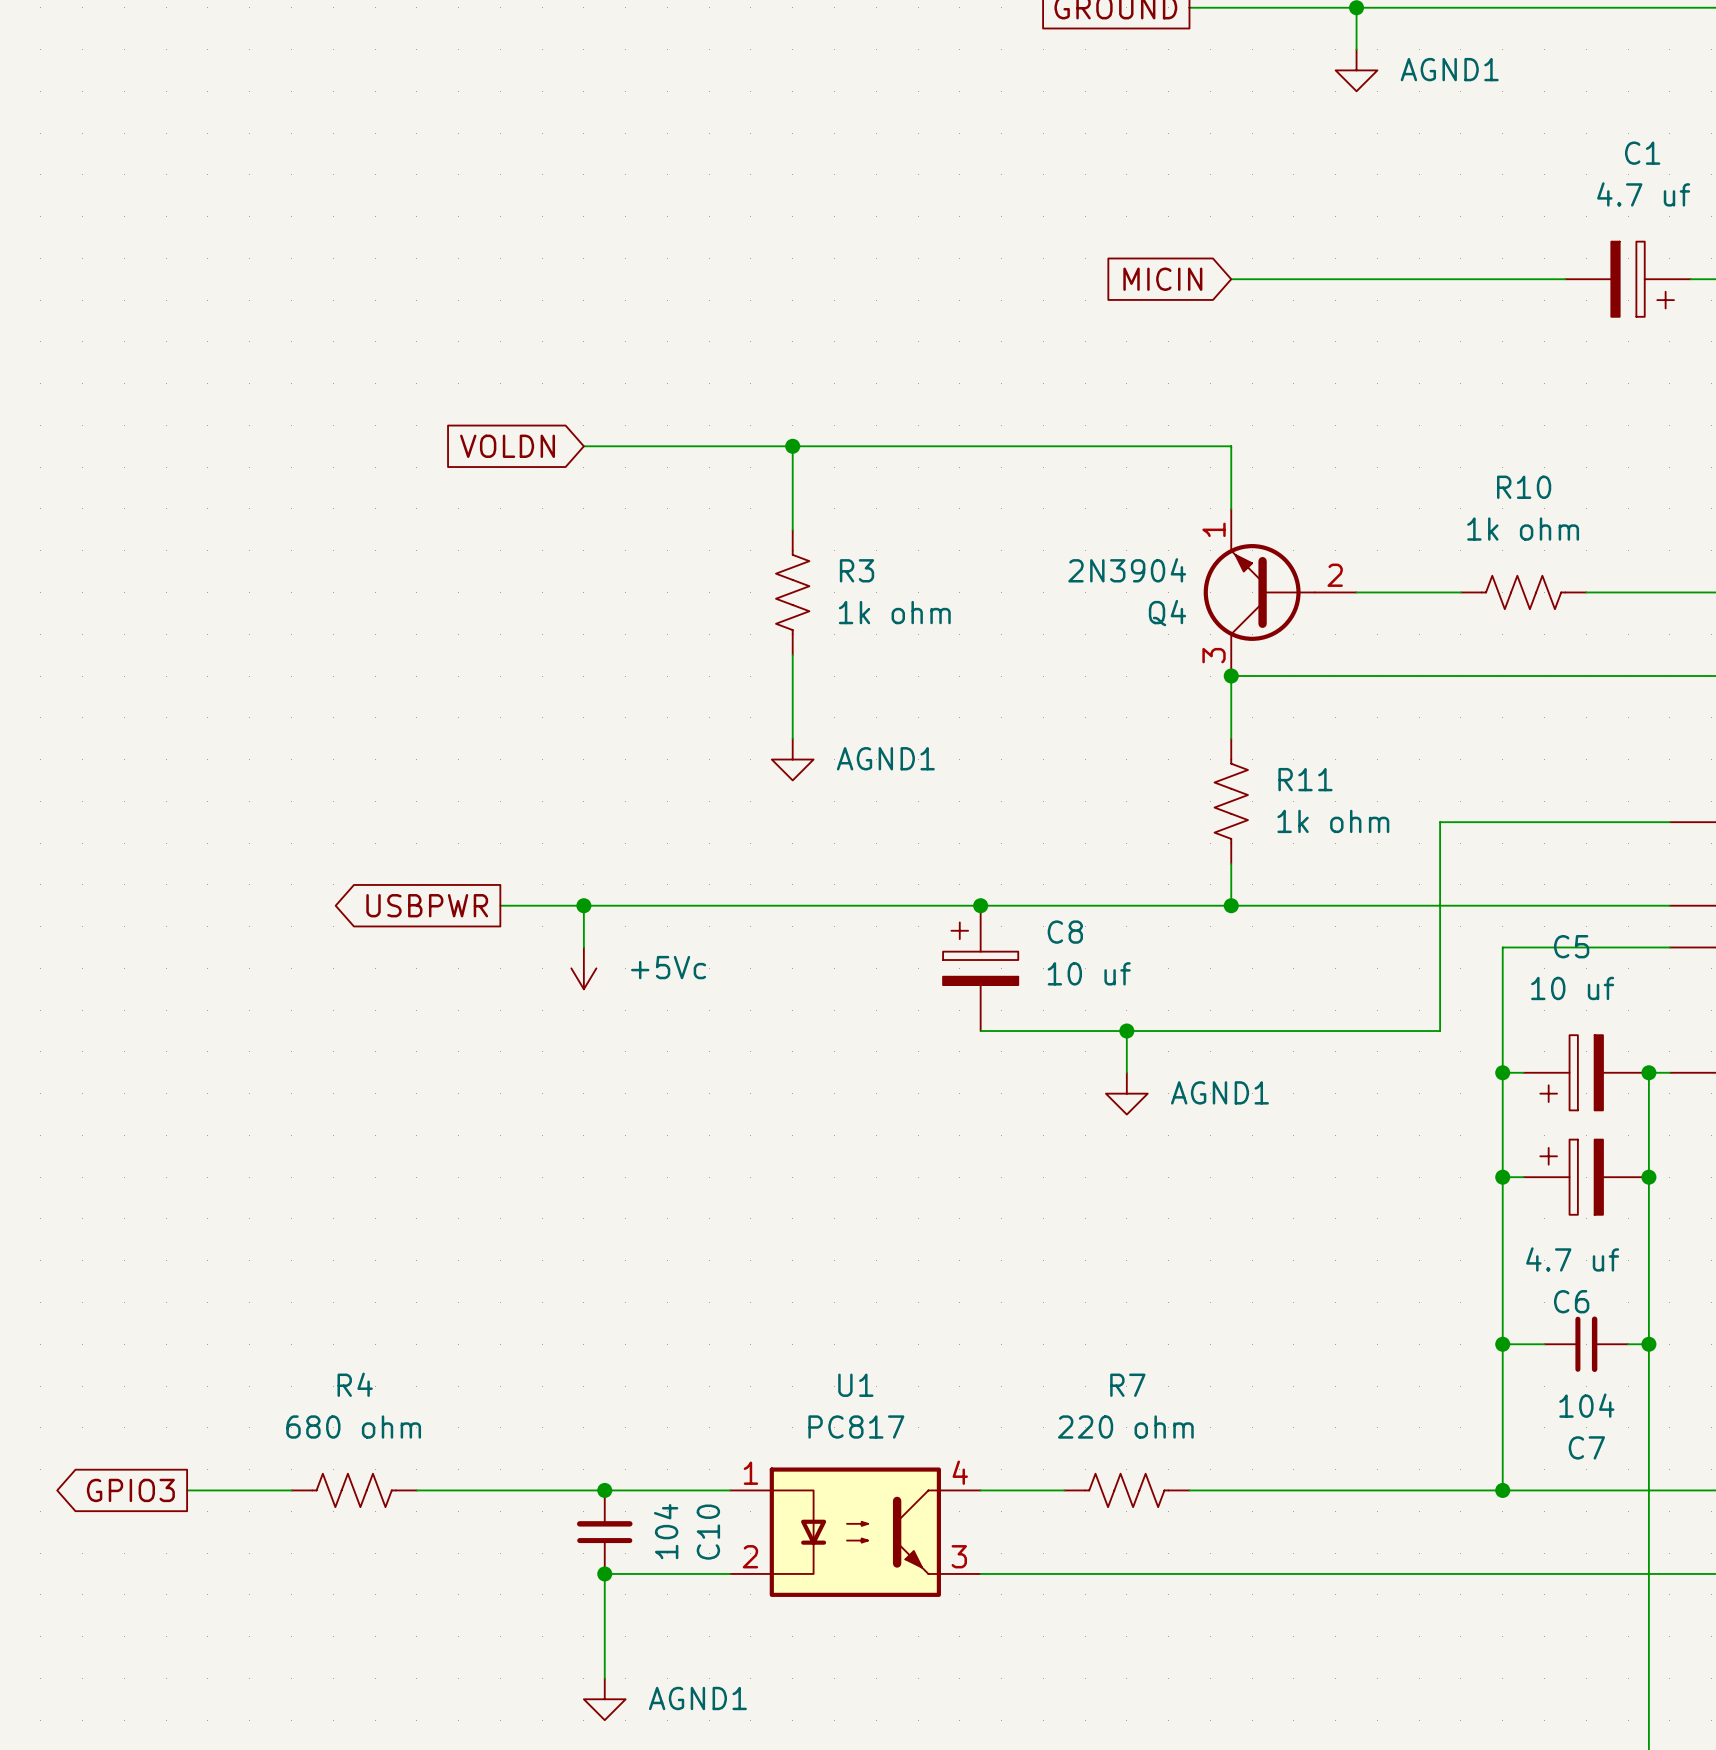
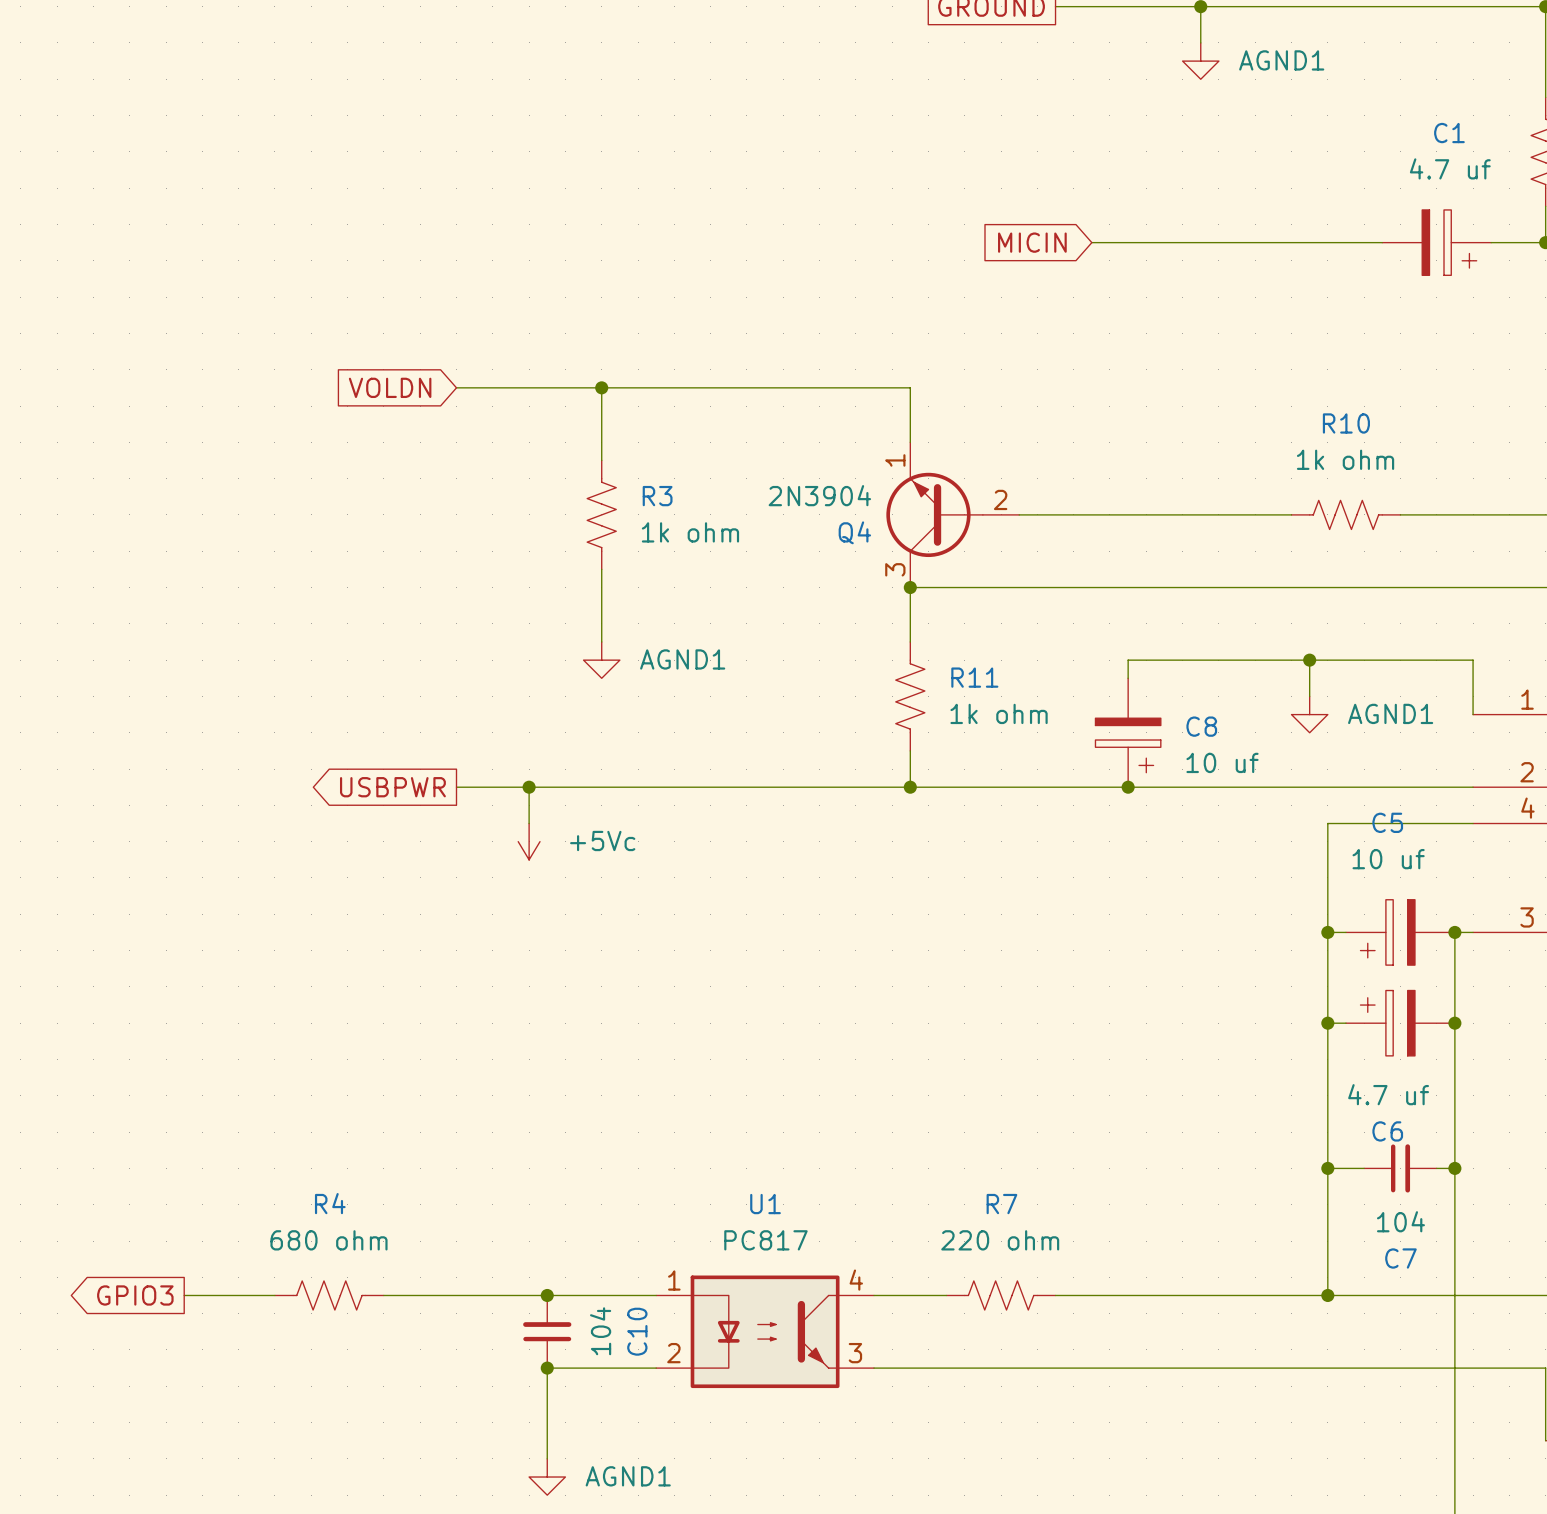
wire: none -> (456, 387) (529, 387)
global label position: VOLDN (507, 446) -> VOLDN (390, 387)
junction: none -> (601, 387)
wire: (792, 446) (792, 529) -> (601, 387) (601, 460)
junction: (792, 446) -> none
wire: (1022, 446) (1231, 446) (1231, 508) -> (910, 387) (910, 442)
R3 position: (792, 592) -> (601, 514)
wire: none -> (1019, 514) (1200, 514)
Q4 position: (1280, 592) -> (952, 514)
wire: (792, 655) (792, 738) -> (601, 569) (601, 641)
junction: none -> (910, 587)
wire: (1231, 676) (1231, 738) -> (1091, 587) (910, 587) (910, 641)
junction: (1231, 676) -> none
power symbol position: AGND1 (792, 759) -> AGND1 (601, 660)
junction: none -> (1309, 660)
R11 position: (1231, 801) -> (910, 696)
power symbol: none -> AGND1 (1309, 714)
wire: (1669, 822) (1440, 822) (1440, 1031) (980, 1031) -> (1473, 714) (1473, 660) (1128, 660) (1128, 678)
wire: (1231, 863) (1231, 905) -> (1309, 660) (1309, 696)
junction position: (980, 905) -> (910, 787)
junction position: (1231, 905) -> (1128, 787)
C8 rotation: 0° (980, 953) -> 180° (1128, 745)
C8 position: (980, 968) -> (1128, 732)
wire: (1126, 1031) (1126, 1072) -> (910, 750) (910, 787)
junction: (1126, 1031) -> none
power symbol: AGND1 (1126, 1093) -> none

